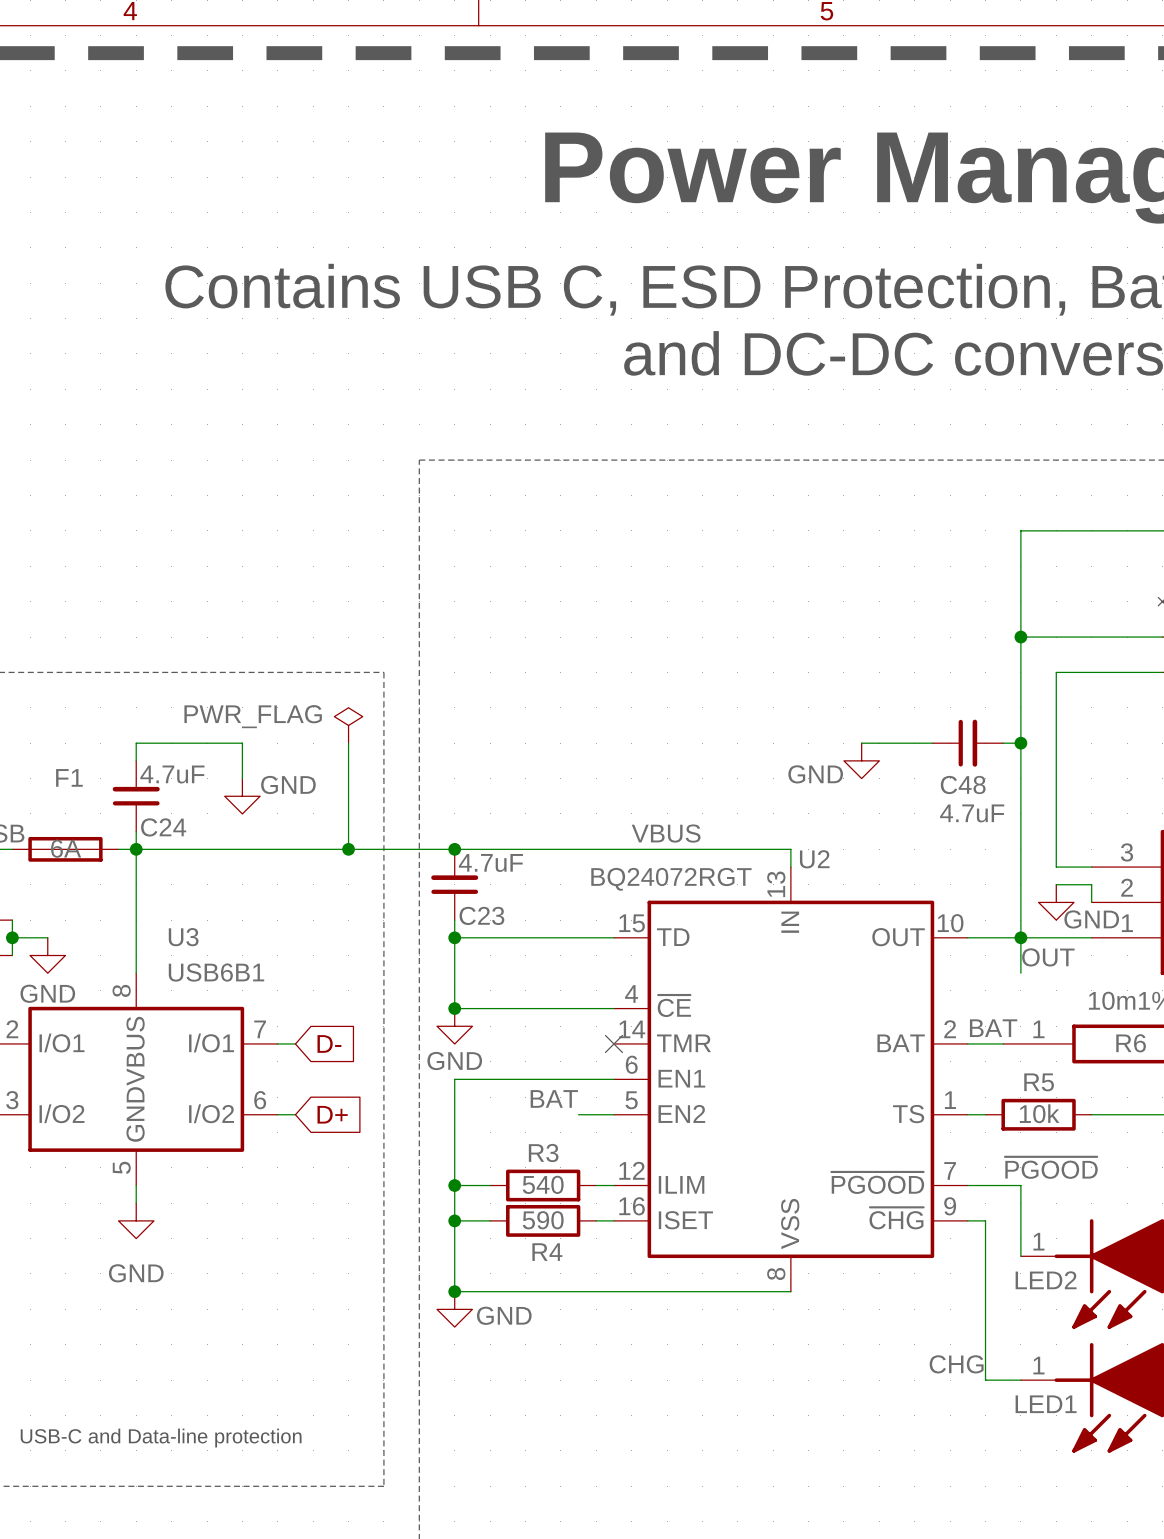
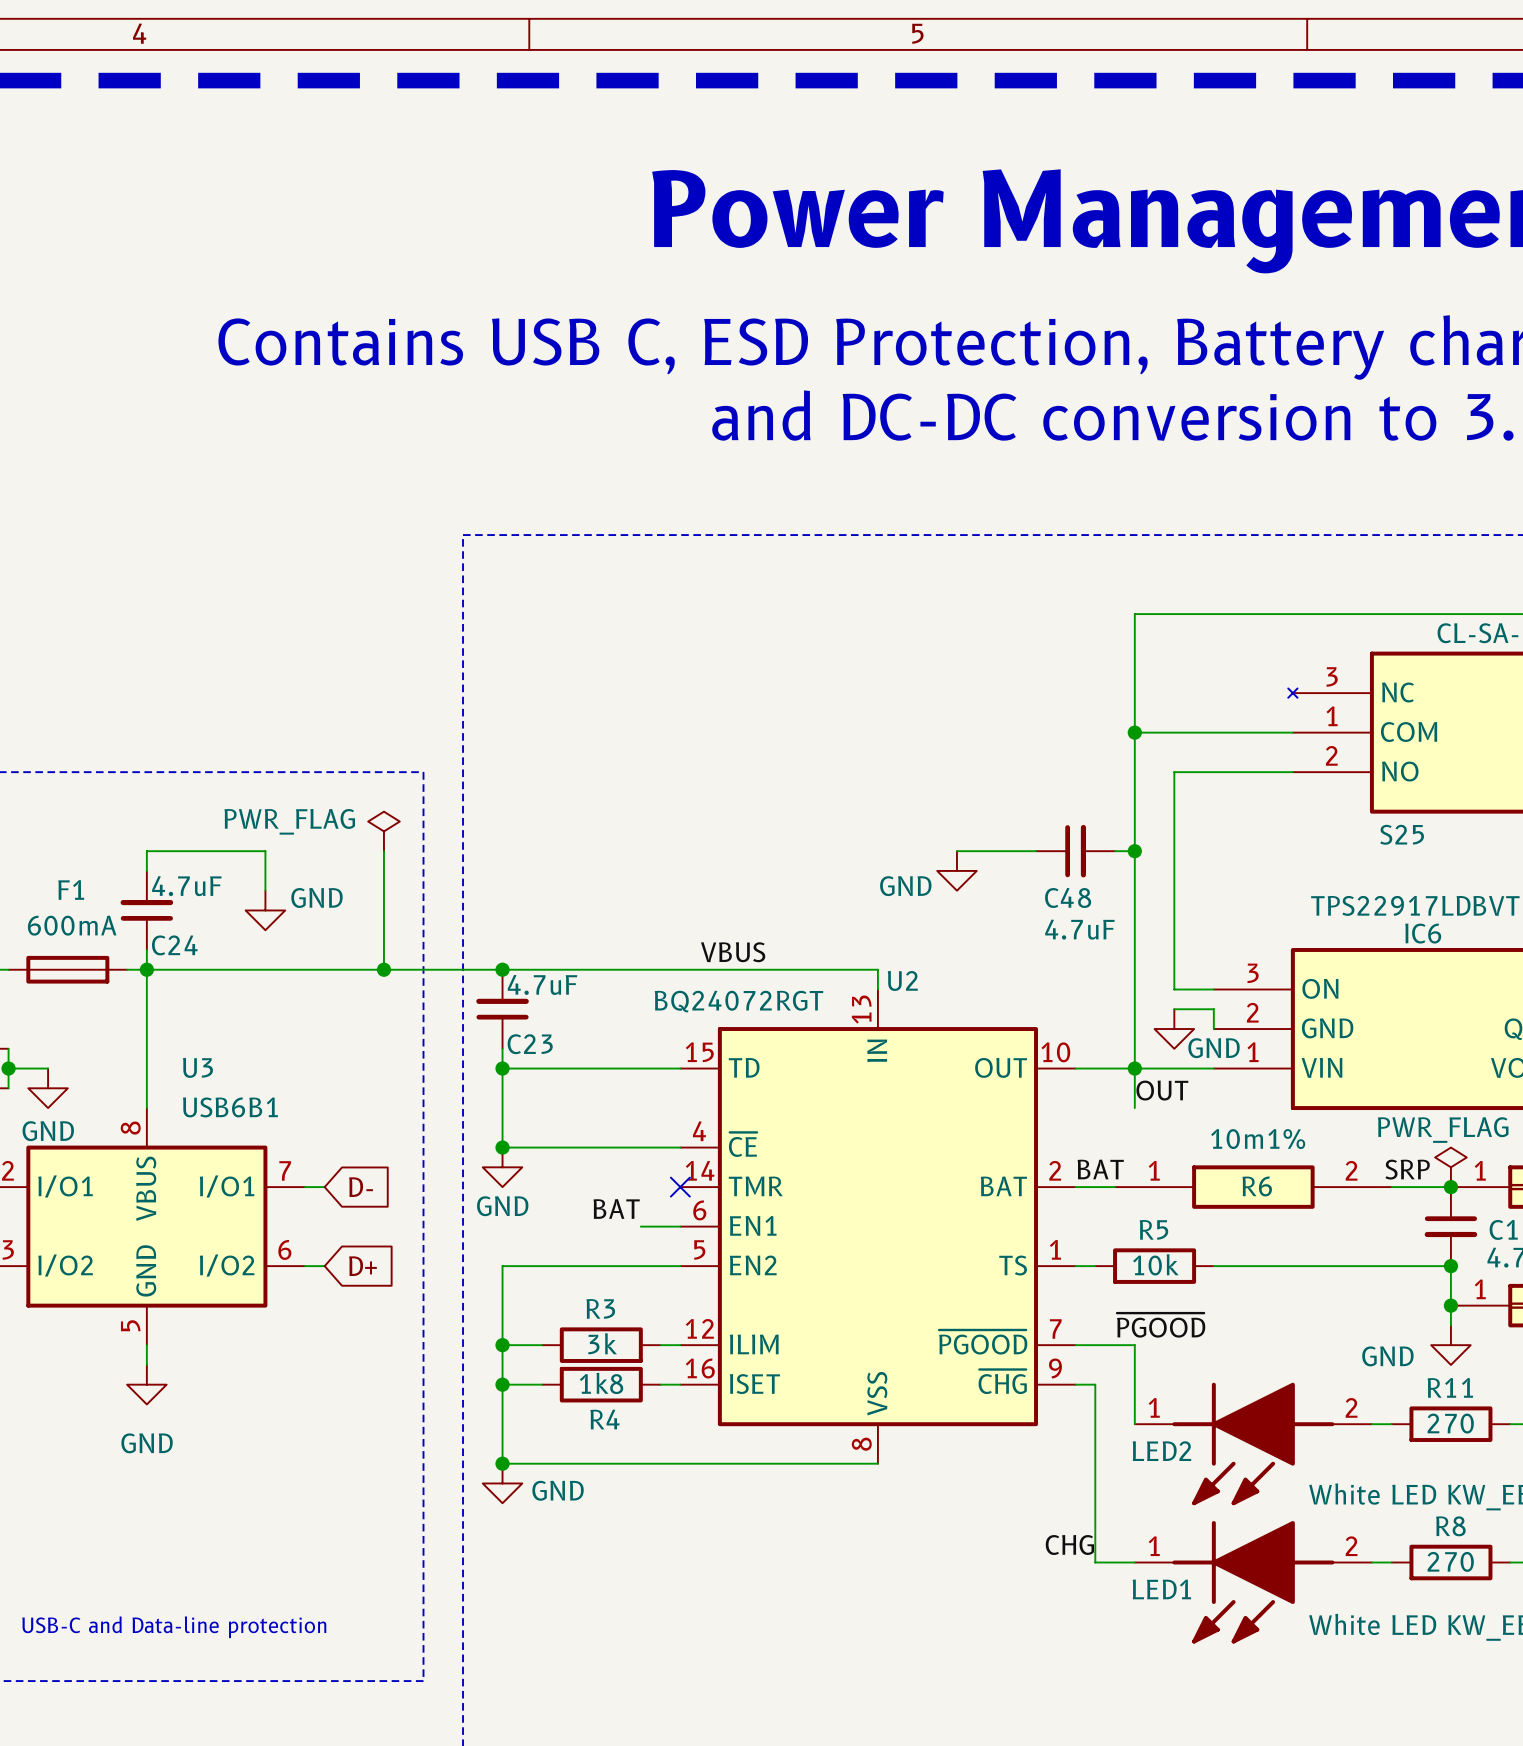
F1 value: 6A (66, 848) -> 600mA (72, 925)
wire: (578, 1079) (454, 1079) (454, 1114) -> (640, 1266) (502, 1266)
label position: BAT (554, 1098) -> BAT (616, 1208)
R3 value: 540 (543, 1184) -> 3k (602, 1343)
R4 value: 590 (543, 1220) -> 1k8 (601, 1383)

